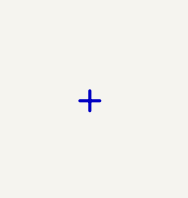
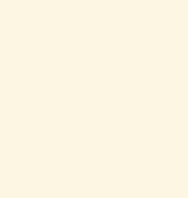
text: + (89, 100) -> none

